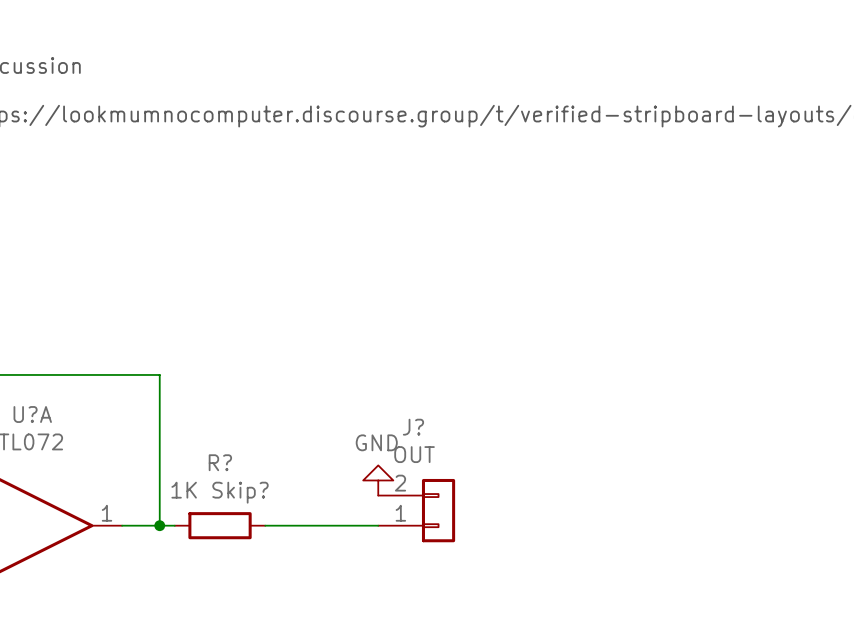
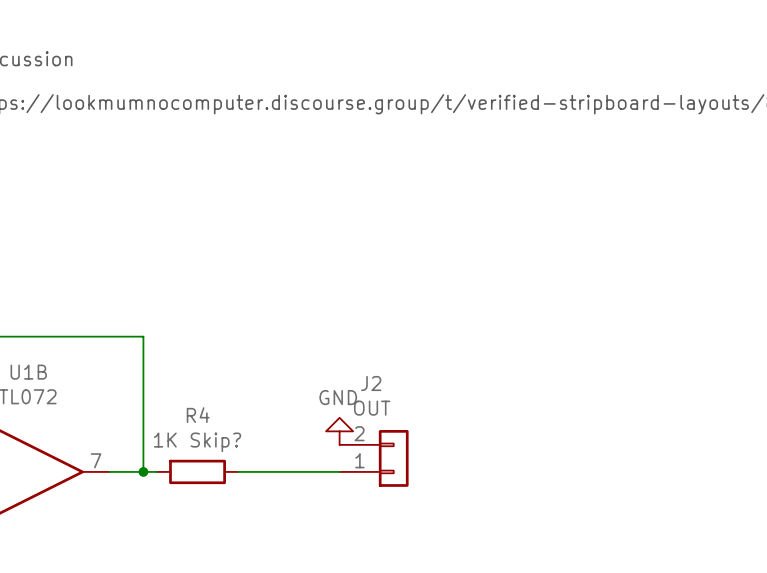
U?A name: U?A (32, 414) -> U1B (28, 372)
J? name: J? (413, 427) -> J2 (371, 383)
R? name: R? (220, 462) -> R4 (198, 415)
U?A pin number: 1 (107, 513) -> 7 (96, 460)

